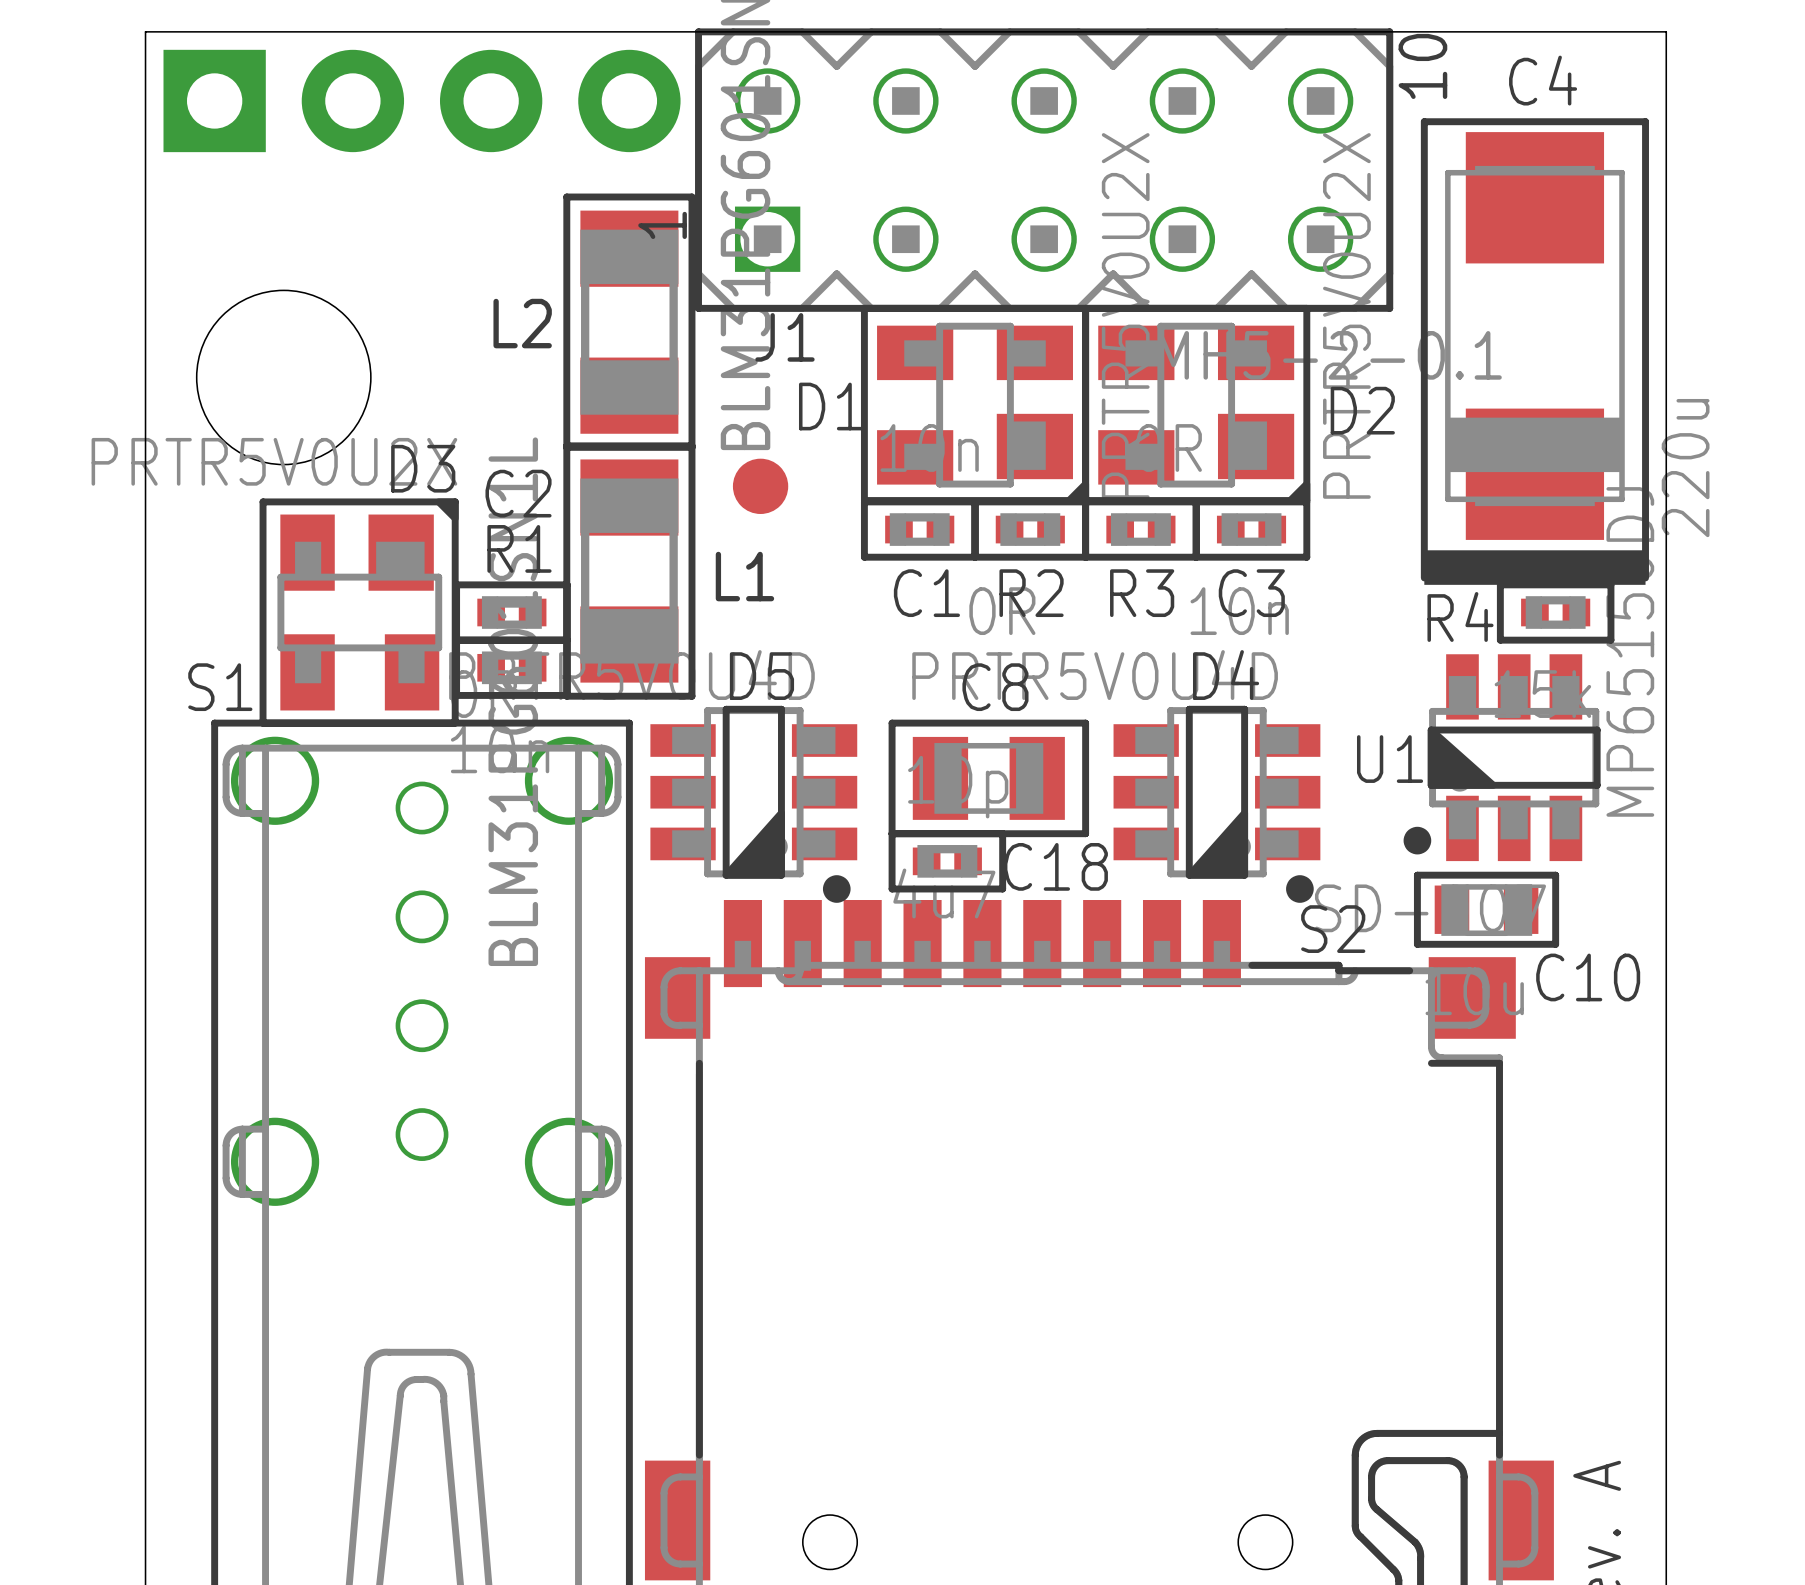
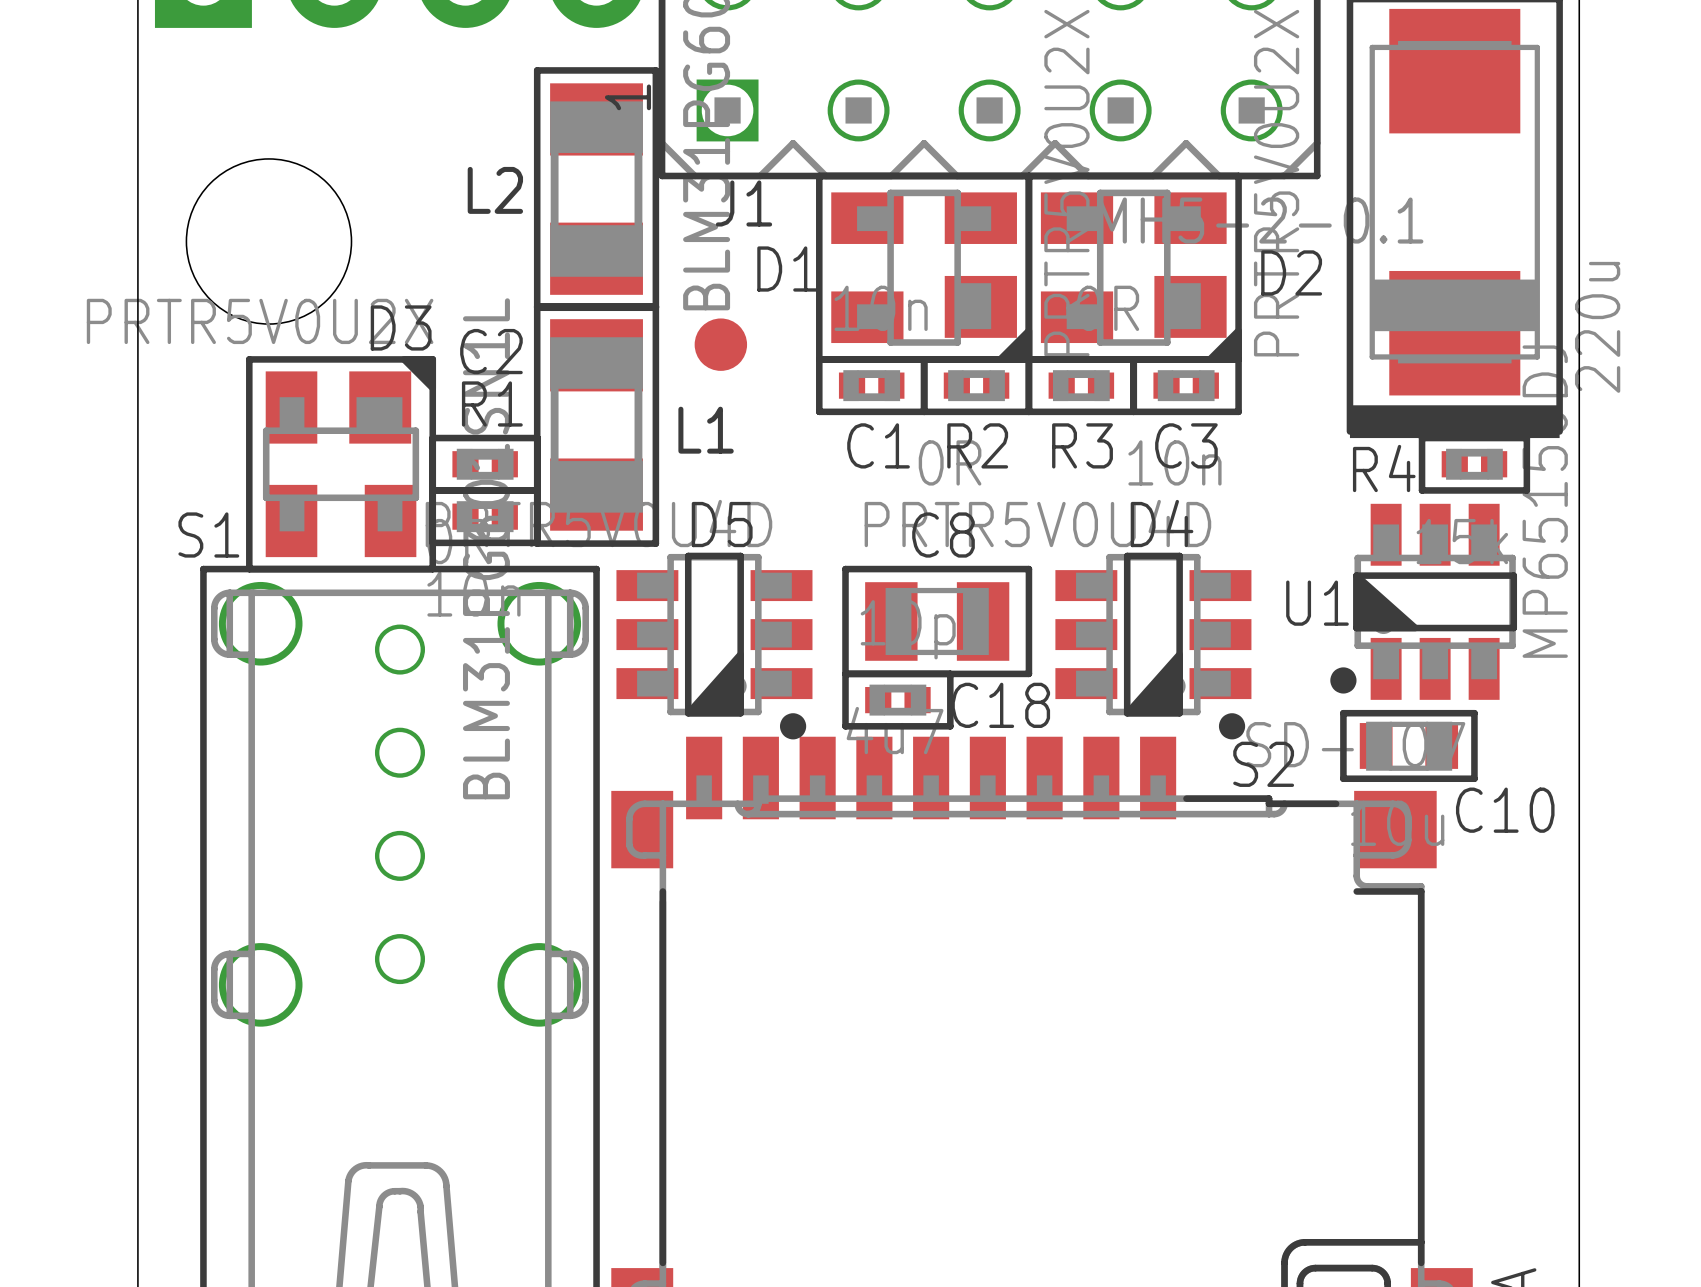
D1 footprint: [860, 304, 1090, 504] -> [816, 172, 1033, 363]
D2 footprint: [1082, 304, 1311, 504] -> [1025, 172, 1242, 363]
D3 footprint: [259, 498, 459, 727] -> [246, 356, 437, 573]

